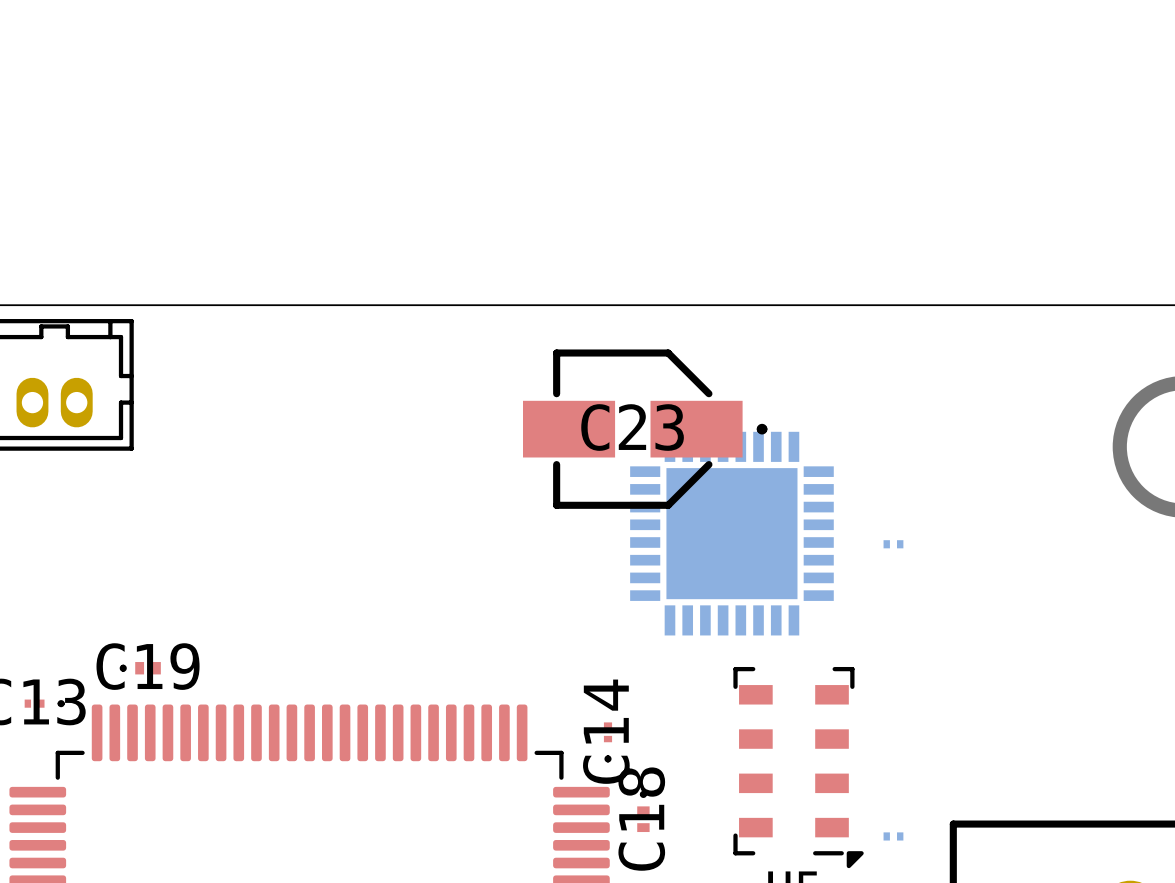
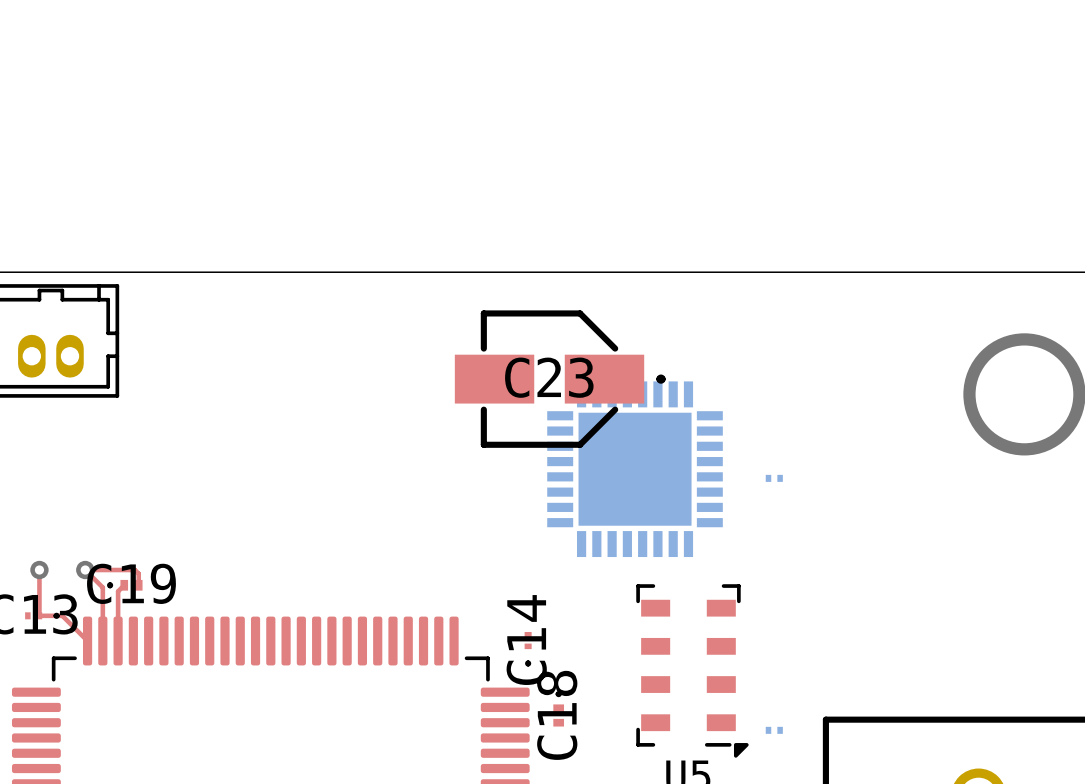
top track: none -> (39, 570) (39, 615) (62, 615) (87, 641)
via: none -> (39, 570)
via: none -> (85, 570)
top track: none -> (124, 585) (118, 591) (118, 641)
top track: none -> (138, 585) (138, 573) (134, 570) (85, 570) (102, 587) (102, 641)

